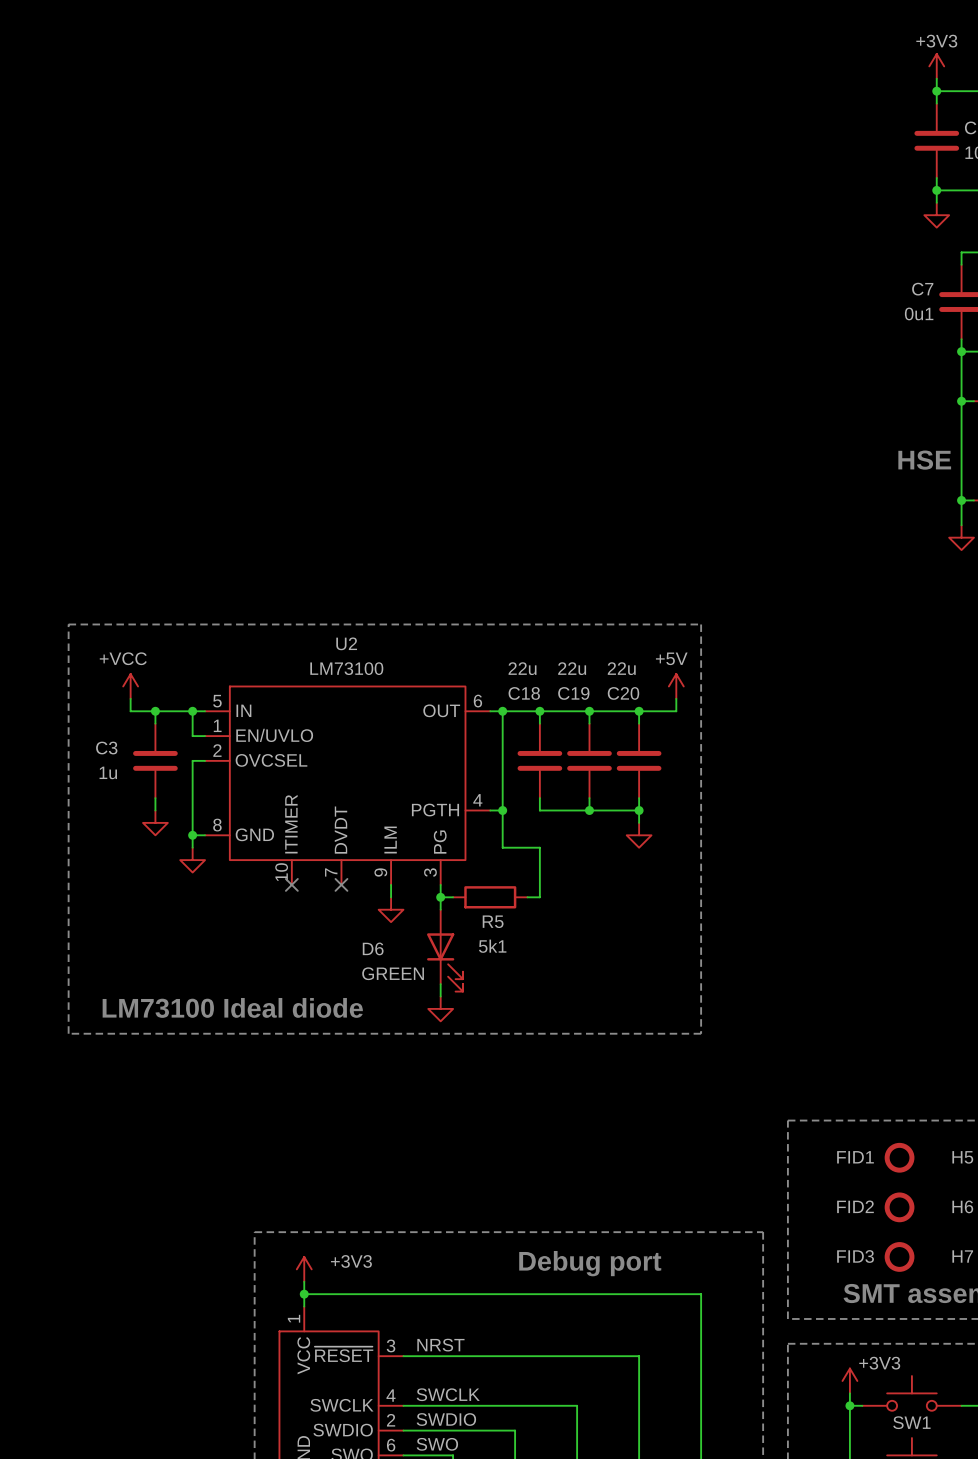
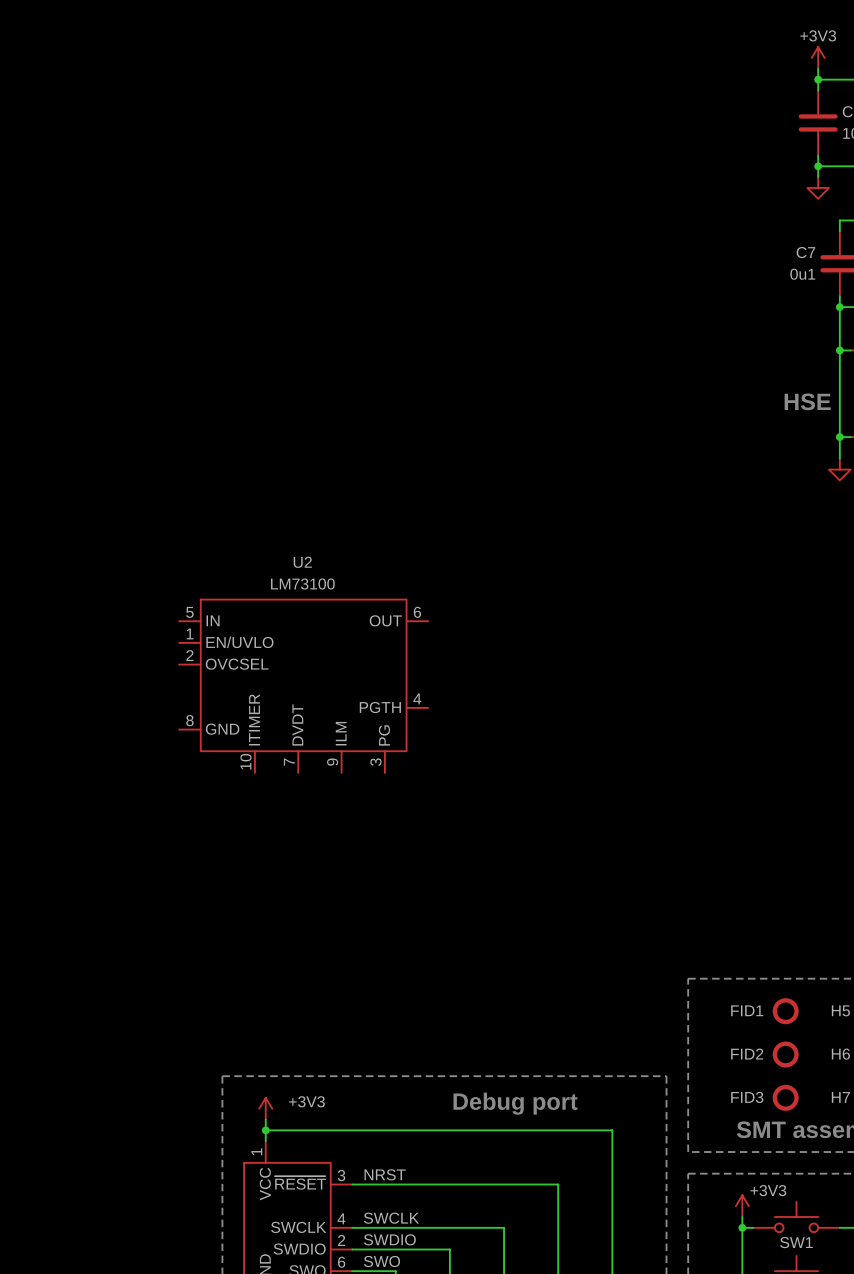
line: (68, 624) (701, 624) (701, 1033) (68, 1033) (68, 624) -> none
power symbol: +VCC (130, 686) -> none
power symbol: +5V (676, 686) -> none
wire: (130, 698) (130, 711) (205, 711) -> none
wire: (676, 698) (676, 711) (490, 711) -> none
wire: (155, 711) (155, 723) -> none
junction: (155, 711) -> none
wire: (192, 711) (192, 736) (205, 736) -> none
junction: (192, 711) -> none
wire: (502, 711) (502, 847) (539, 847) (539, 897) (527, 897) -> none
junction: (502, 711) -> none
wire: (539, 711) (539, 723) -> none
junction: (539, 711) -> none
wire: (589, 711) (589, 723) -> none
junction: (589, 711) -> none
wire: (639, 711) (639, 723) -> none
junction: (639, 711) -> none
C3: 1u (155, 760) -> none
wire: (205, 760) (192, 760) (192, 847) -> none
C18: 22u (539, 760) -> none
C19: 22u (589, 760) -> none
C20: 22u (639, 760) -> none
wire: (155, 798) (155, 810) -> none
wire: (539, 798) (539, 810) (639, 810) -> none
wire: (589, 798) (589, 810) -> none
wire: (639, 798) (639, 822) -> none
wire: (490, 810) (502, 810) -> none
junction: (502, 810) -> none
junction: (589, 810) -> none
junction: (639, 810) -> none
power symbol: (155, 822) -> none
wire: (192, 835) (205, 835) -> none
junction: (192, 835) -> none
power symbol: (639, 835) -> none
power symbol: (192, 860) -> none
no-connect mark: (291, 884) -> none
no-connect mark: (341, 884) -> none
wire: (391, 884) (391, 897) -> none
wire: (440, 884) (440, 909) -> none
wire: (440, 897) (453, 897) -> none
junction: (440, 897) -> none
R5: 5k1 (490, 897) -> none
power symbol: (391, 909) -> none
D6: GREEN (445, 950) -> none
wire: (440, 984) (440, 996) -> none
text: LM73100 Ideal diode (232, 1007) -> none
power symbol: (440, 1008) -> none

